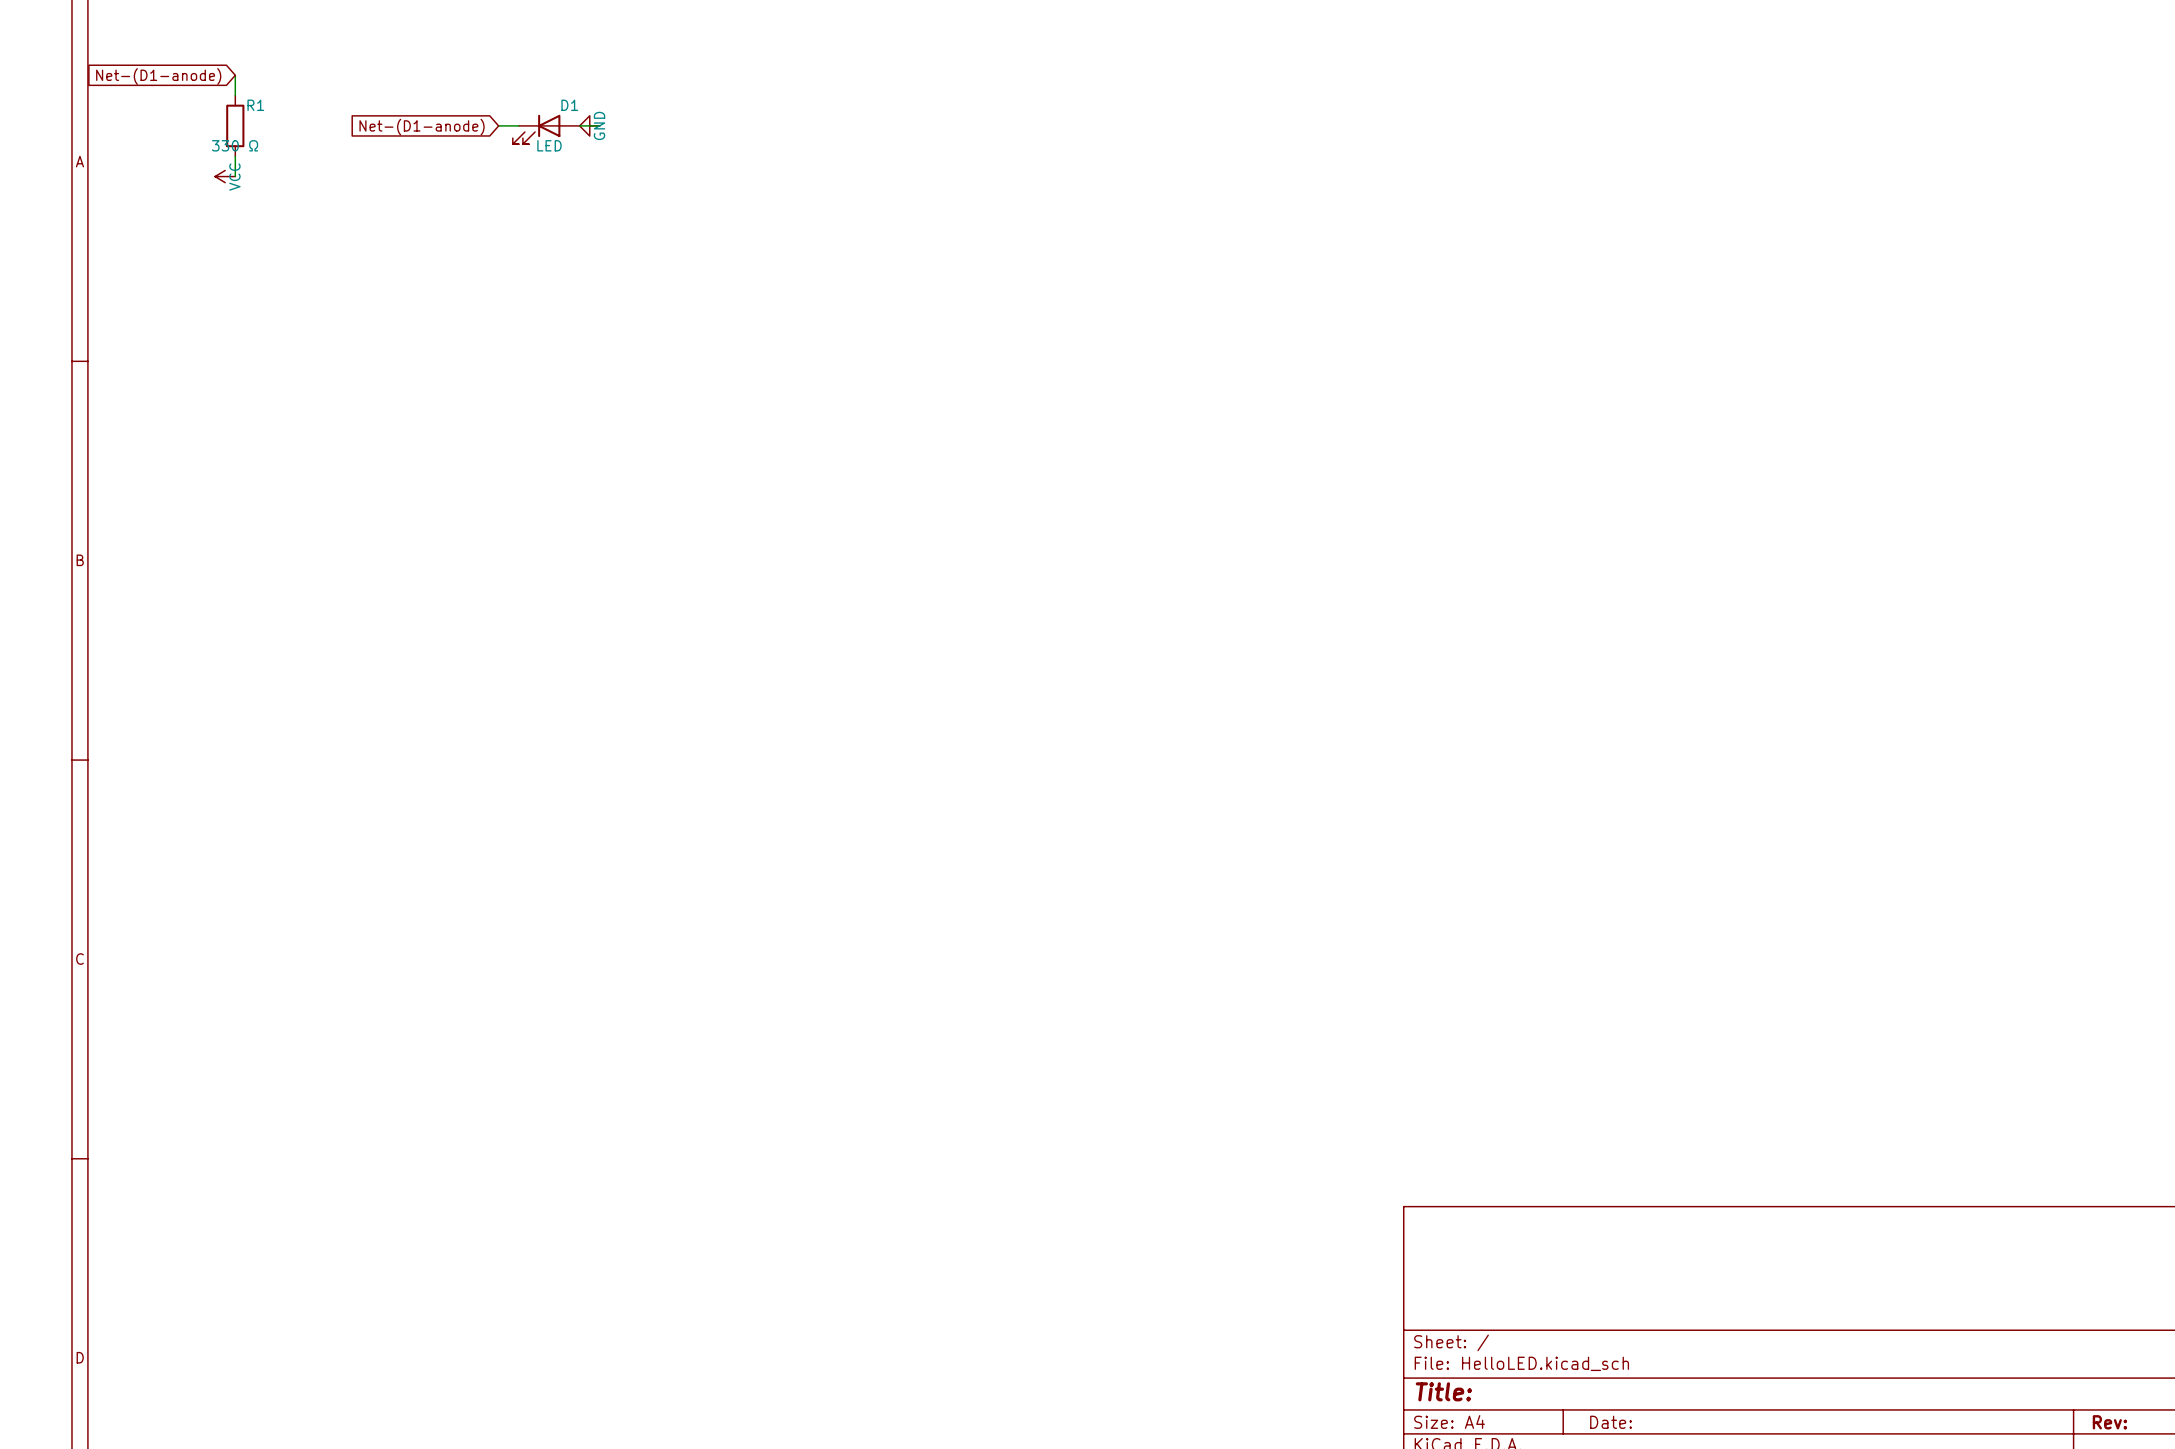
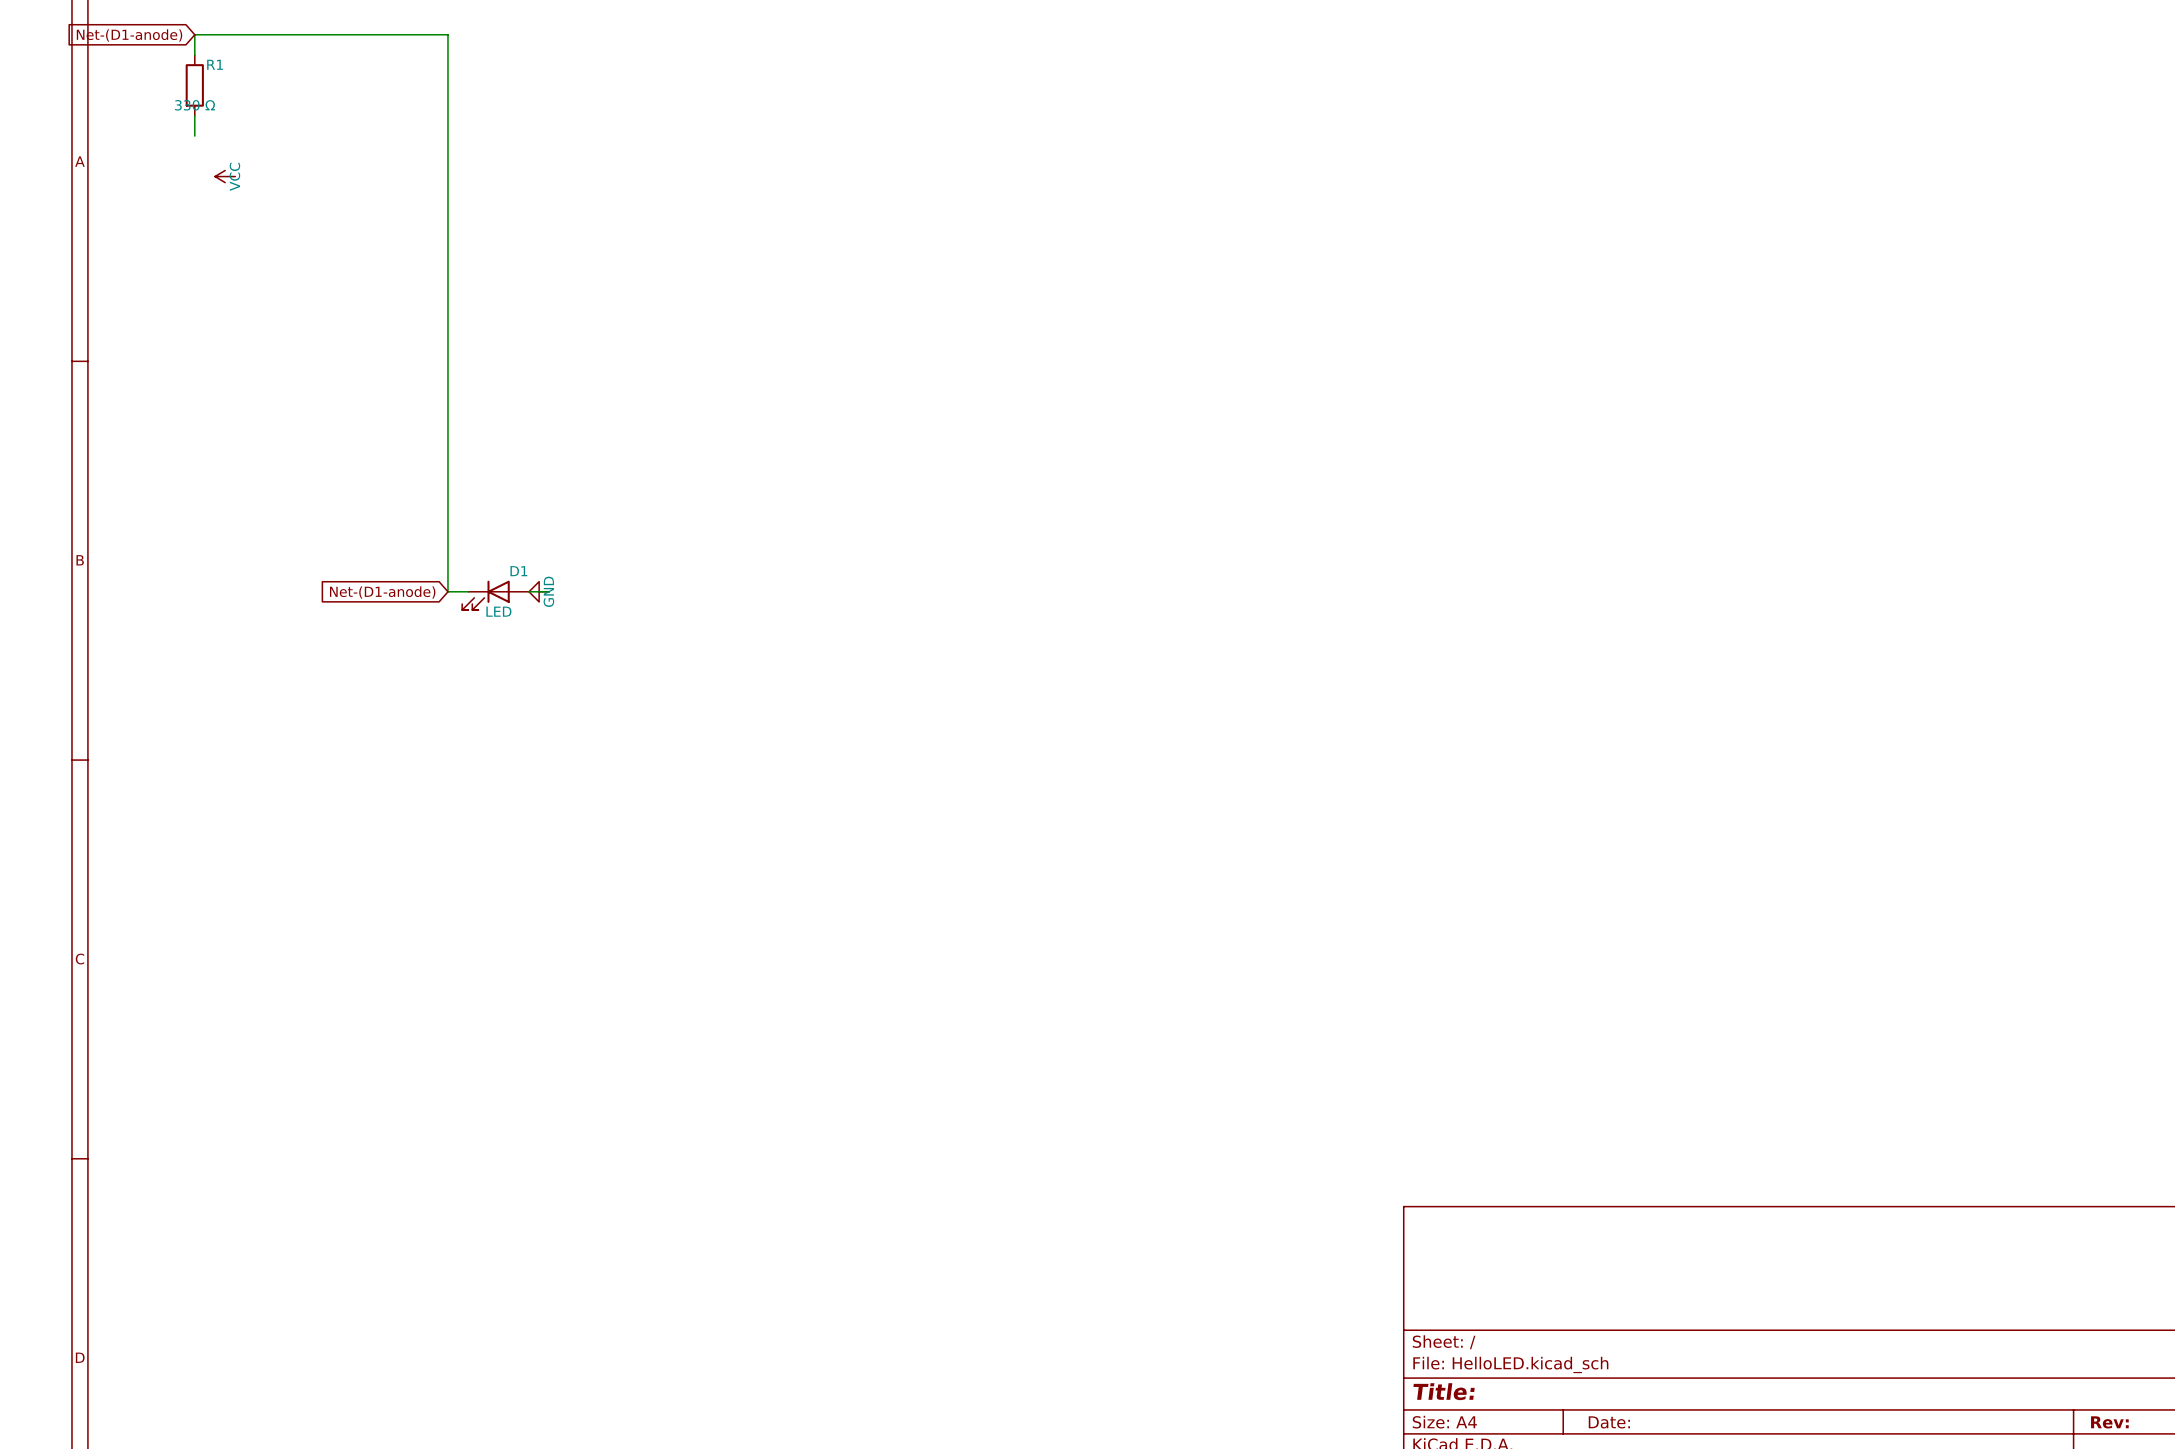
wire: none -> (194, 55) (194, 34) (447, 34) (447, 591) (468, 591)
wire: (235, 75) (235, 95) -> none
global label position: Net-(D1-anode) (158, 76) -> Net-(D1-anode) (129, 35)
R1 position: (235, 125) -> (194, 85)
wire: (498, 125) (518, 125) -> none
wire: (579, 125) (599, 125) -> none
power symbol: GND (589, 125) -> none
global label: Net-(D1-anode) (422, 127) -> none
D1 position: (546, 129) -> (495, 595)
wire: (235, 156) (235, 176) -> (194, 115) (194, 136)
wire: none -> (529, 591) (549, 591)
power symbol: none -> GND (539, 591)
global label: none -> Net-(D1-anode) (382, 592)

